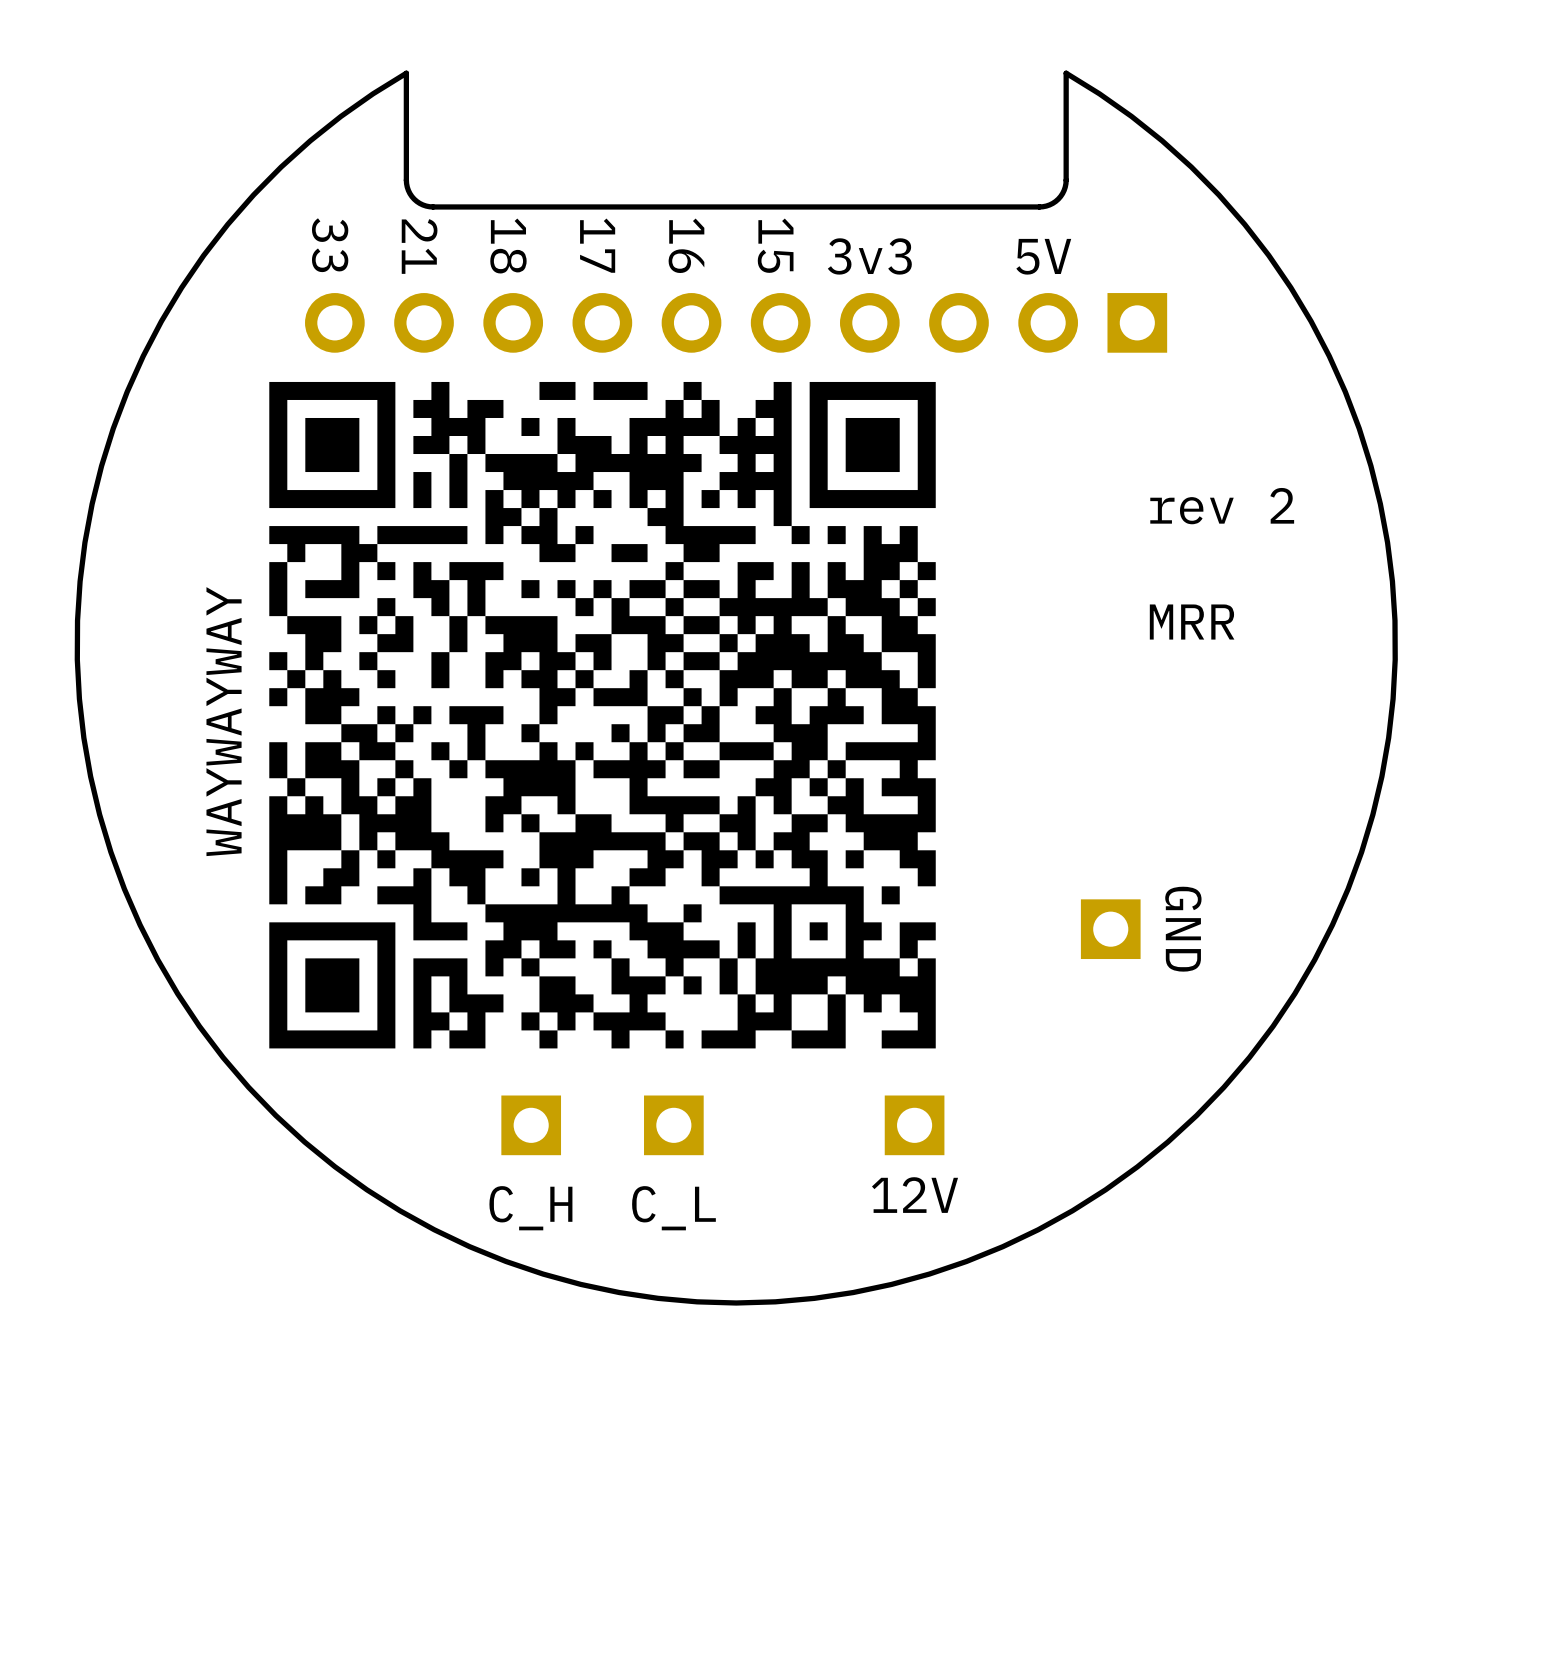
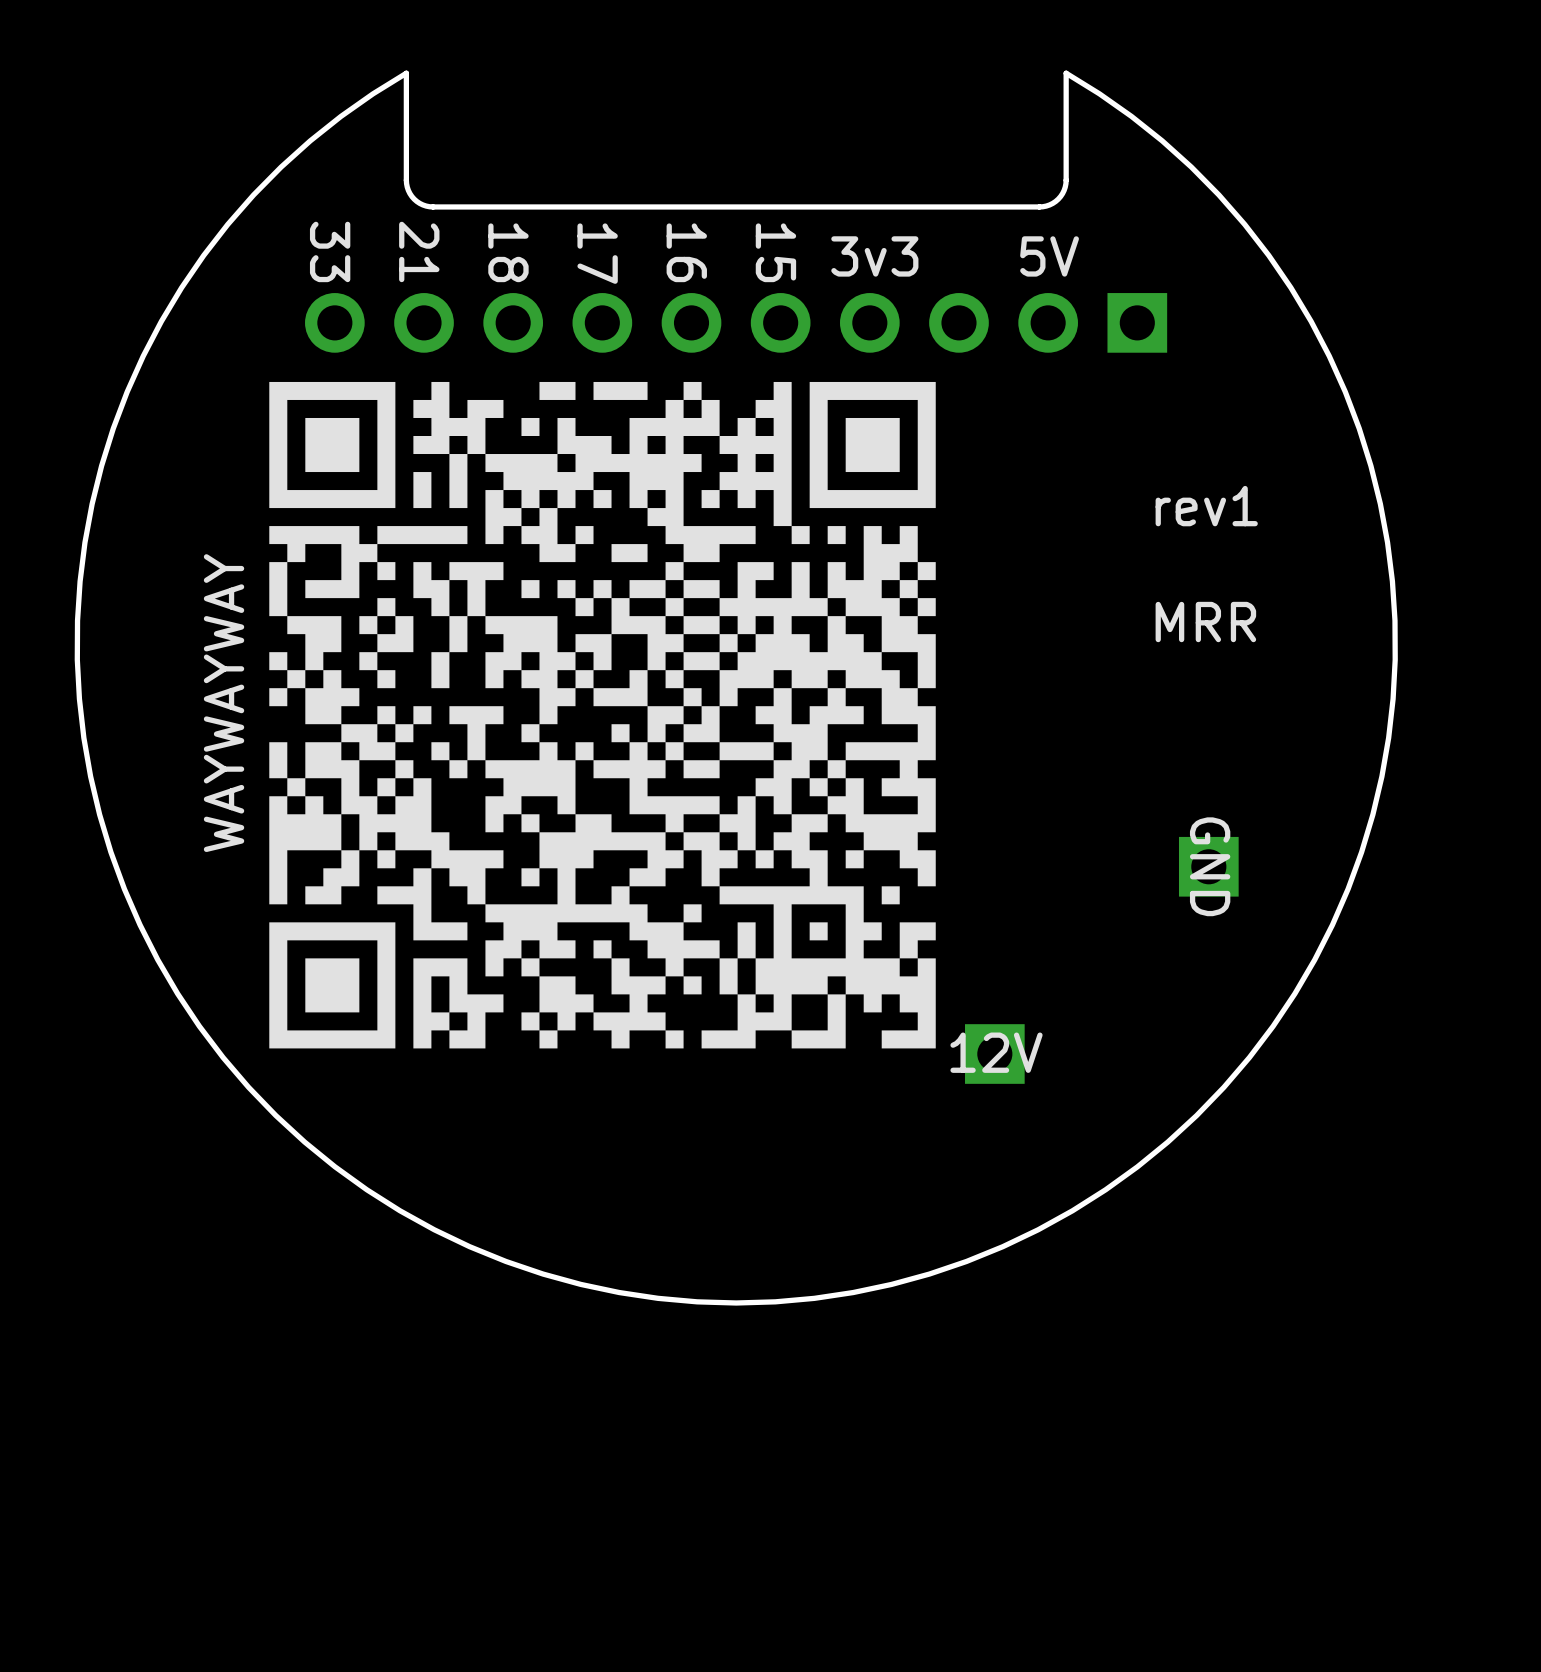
text: rev 2 (1222, 506) -> rev1 (1206, 506)
part position: (1110, 929) -> (1208, 866)
part value position: GND (1183, 929) -> GND (1210, 866)
part: C_H (531, 1125) -> none
part: C_L (673, 1125) -> none
part position: (914, 1125) -> (994, 1054)
part value position: 12V (915, 1195) -> 12V (996, 1052)

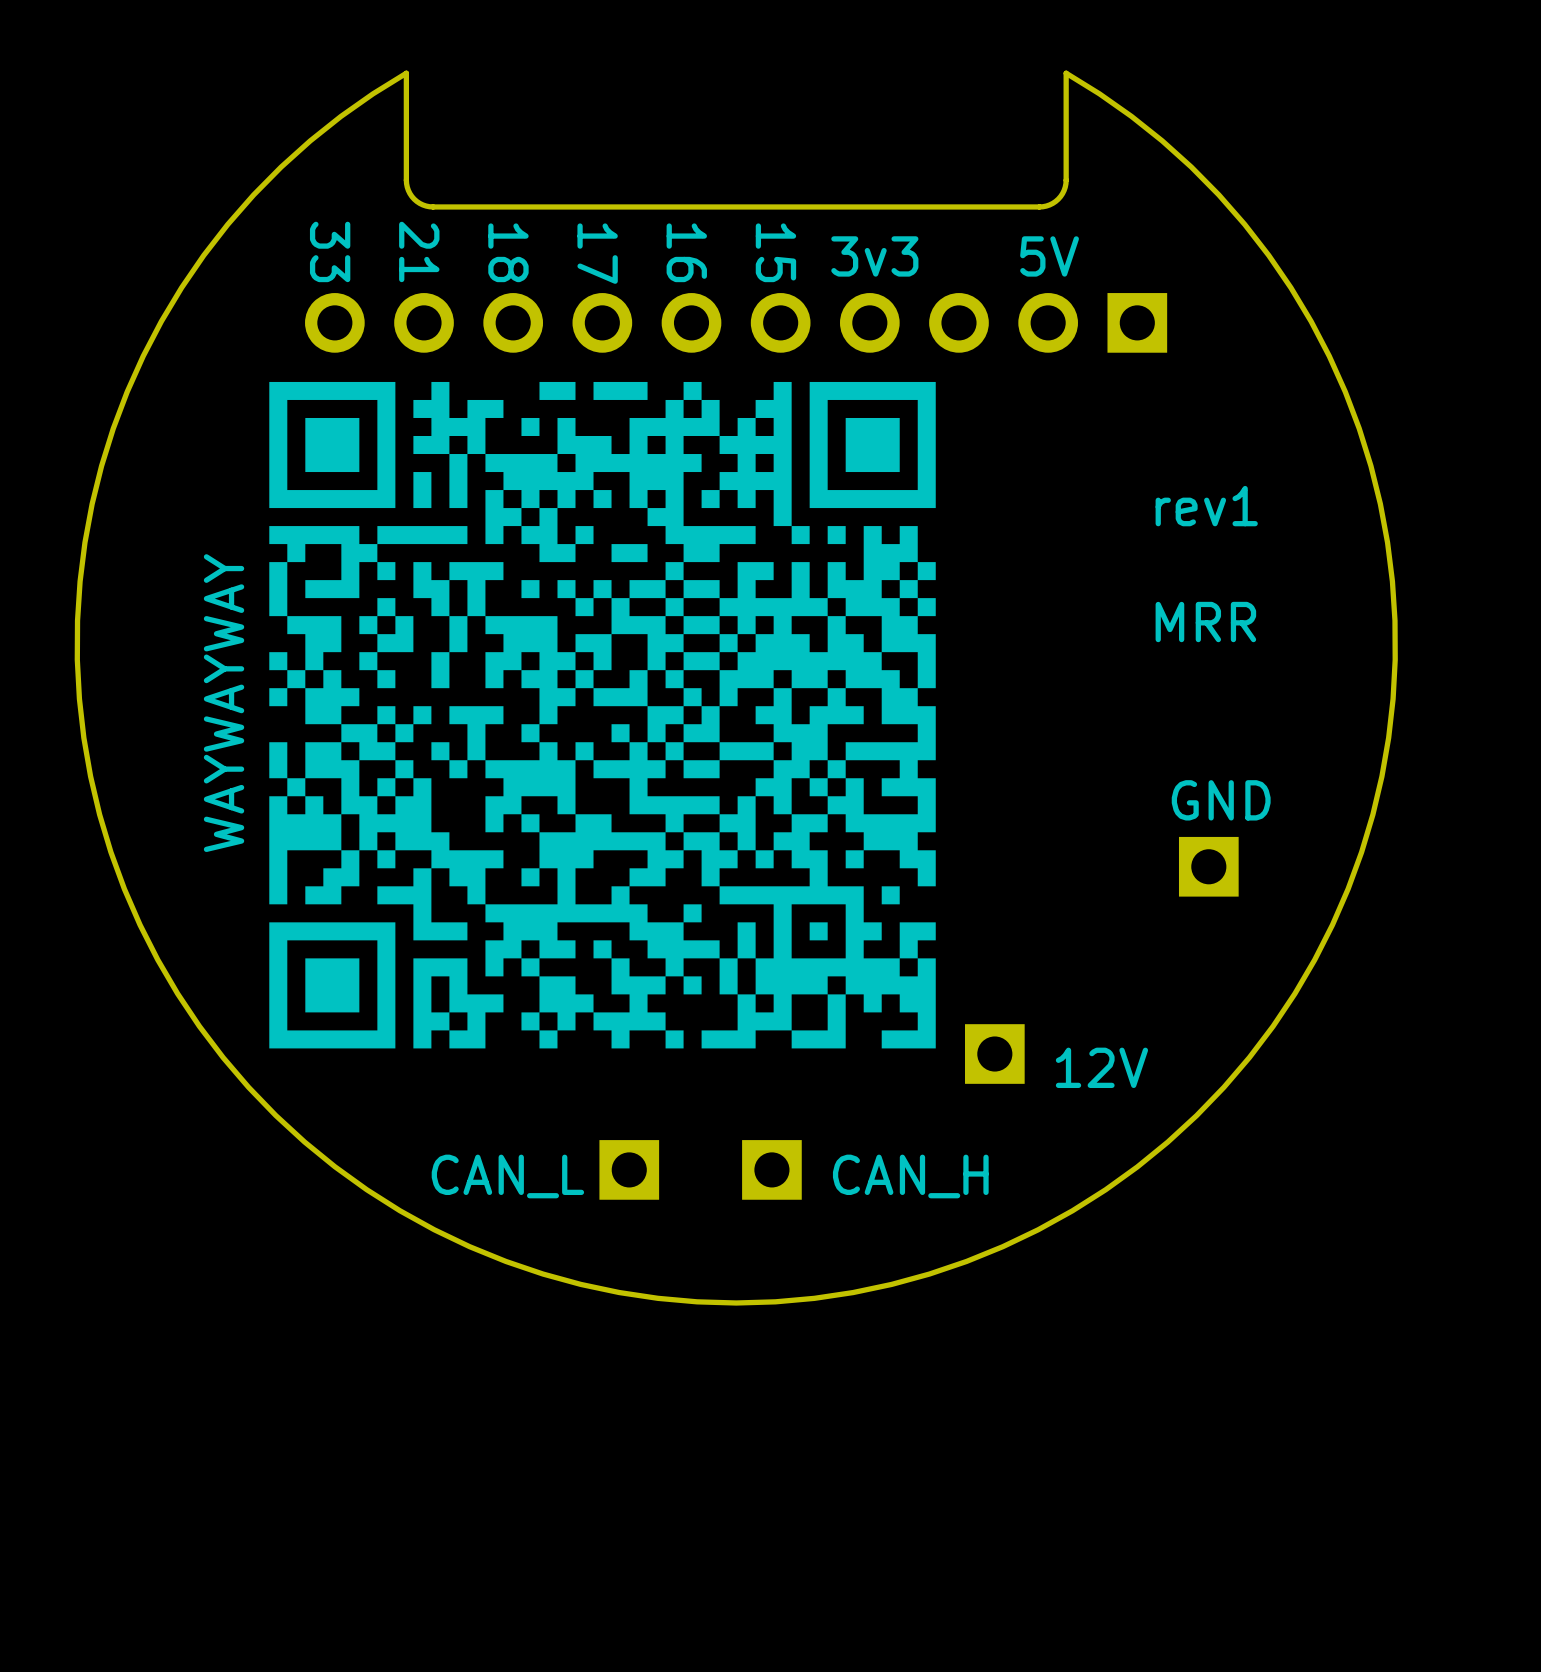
text: none -> GND (1221, 800)
part value: GND (1210, 866) -> none
part value: 12V (996, 1052) -> none
text: none -> 12V (1101, 1067)
part: none -> (629, 1169)
part: none -> (771, 1169)
text: none -> CAN_L (507, 1176)
text: none -> CAN_H (910, 1176)

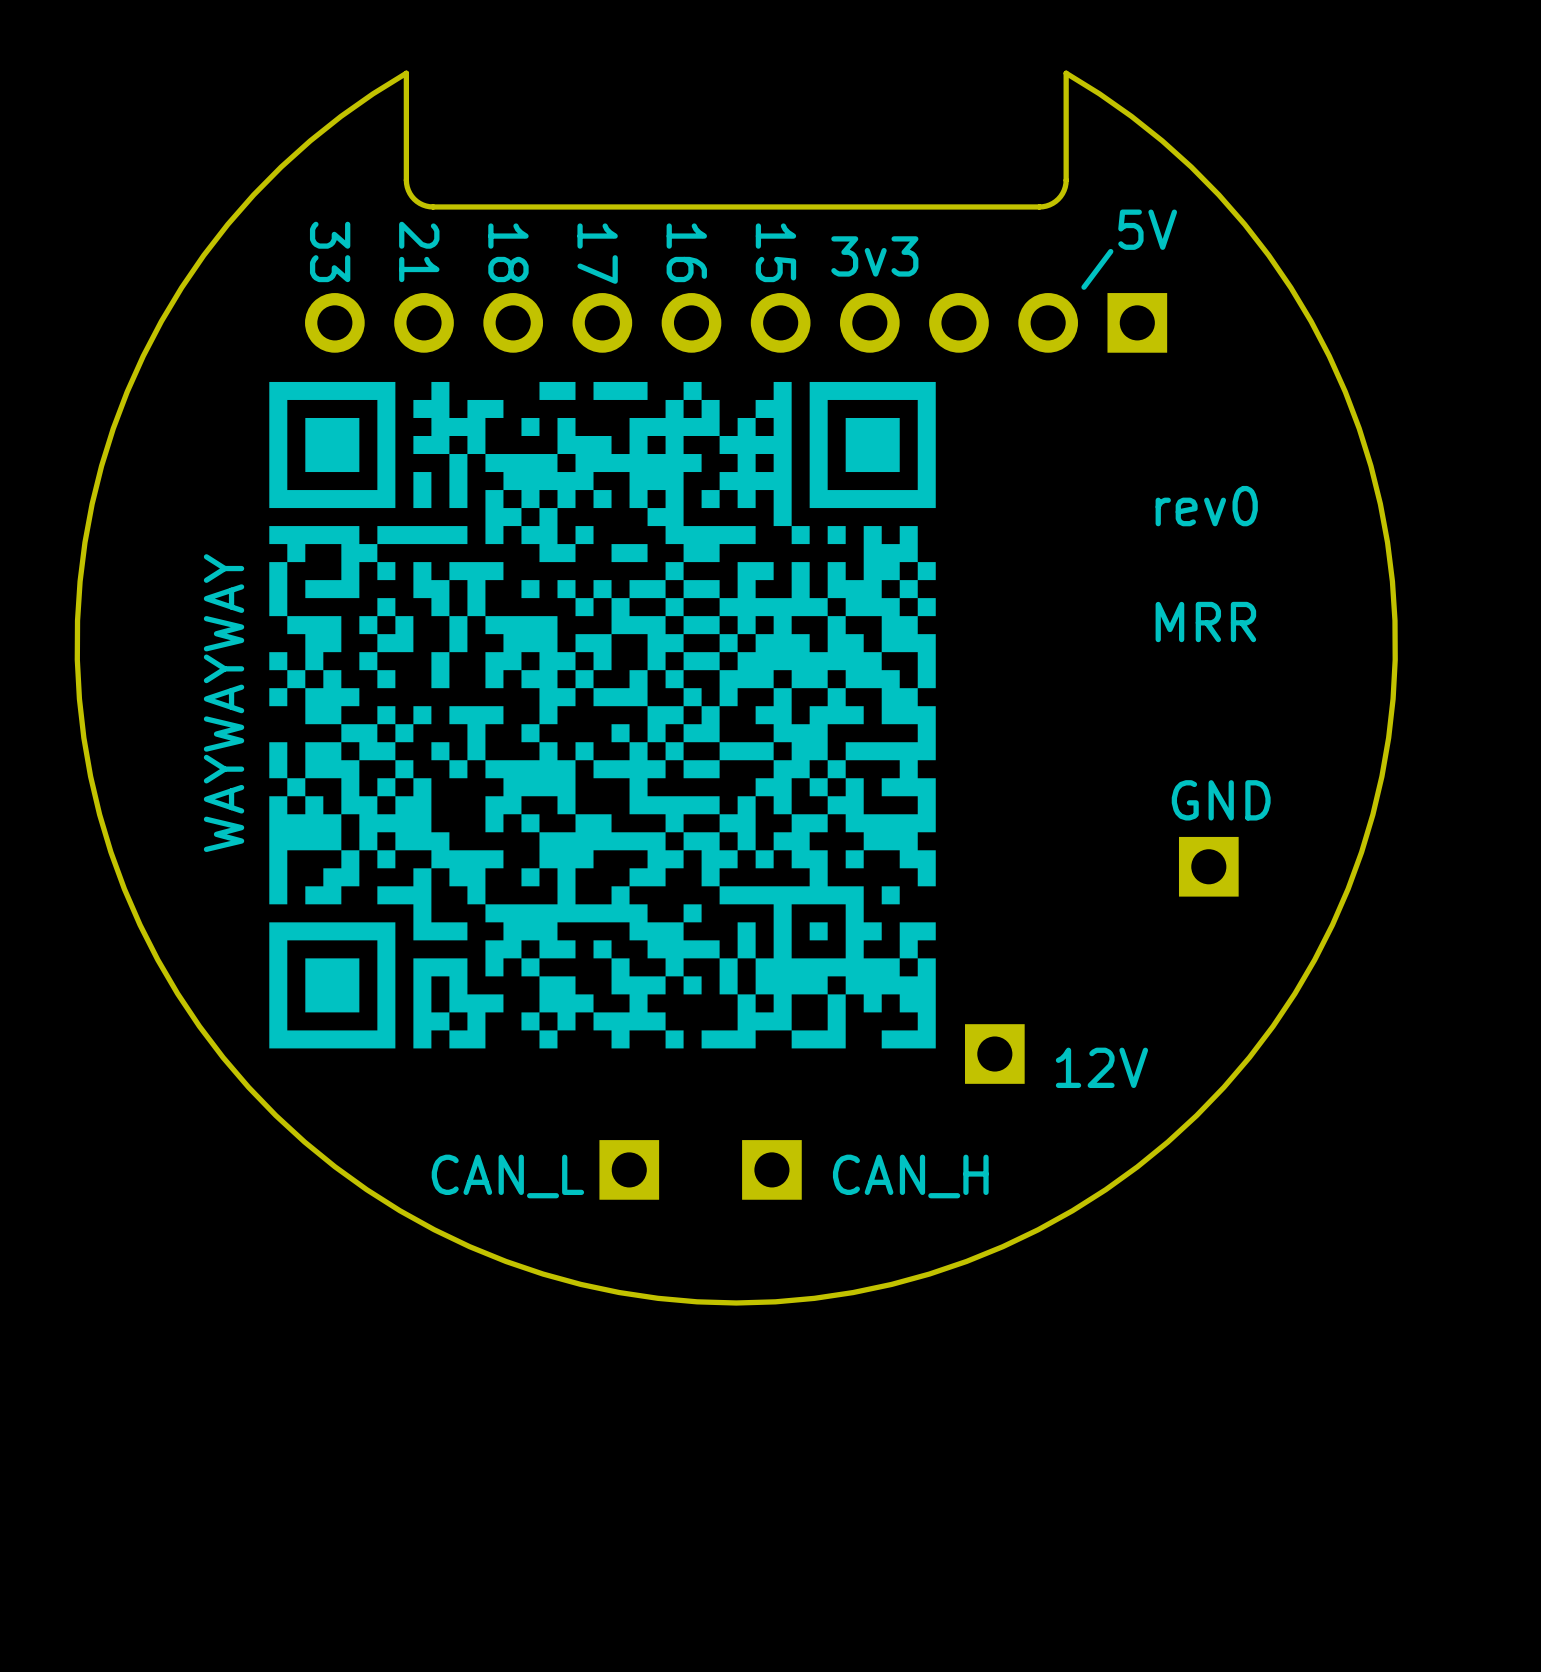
line: none -> (1110, 251) (1083, 287)
text position: 5V (1049, 256) -> 5V (1147, 229)
text: rev1 (1206, 506) -> rev0 (1206, 506)

